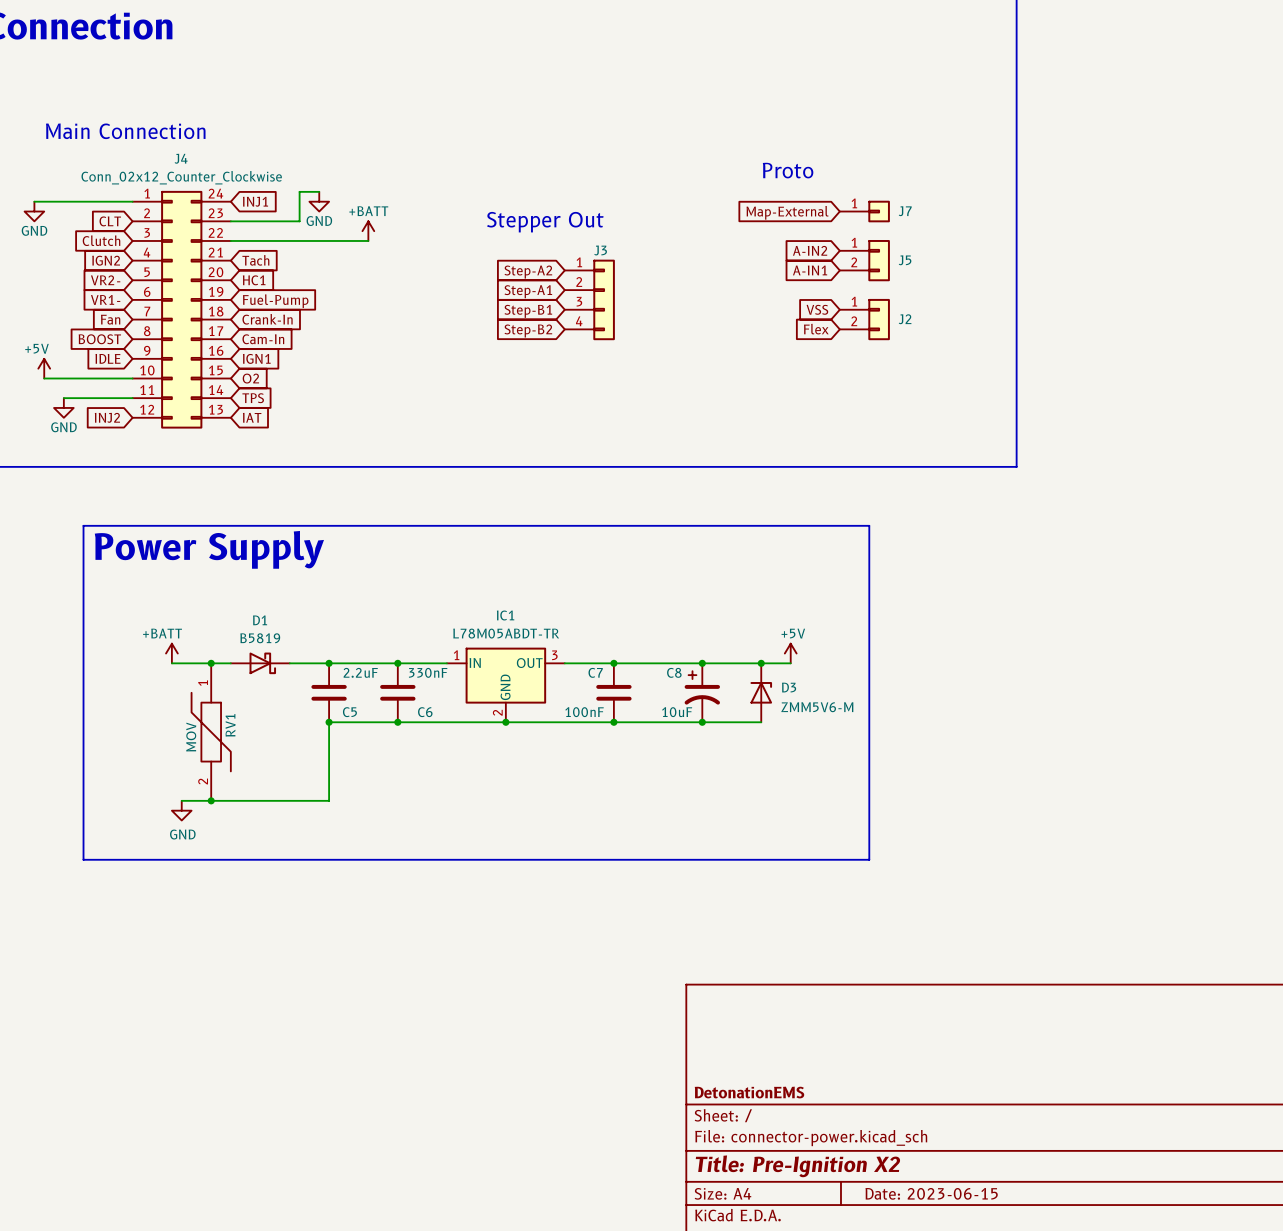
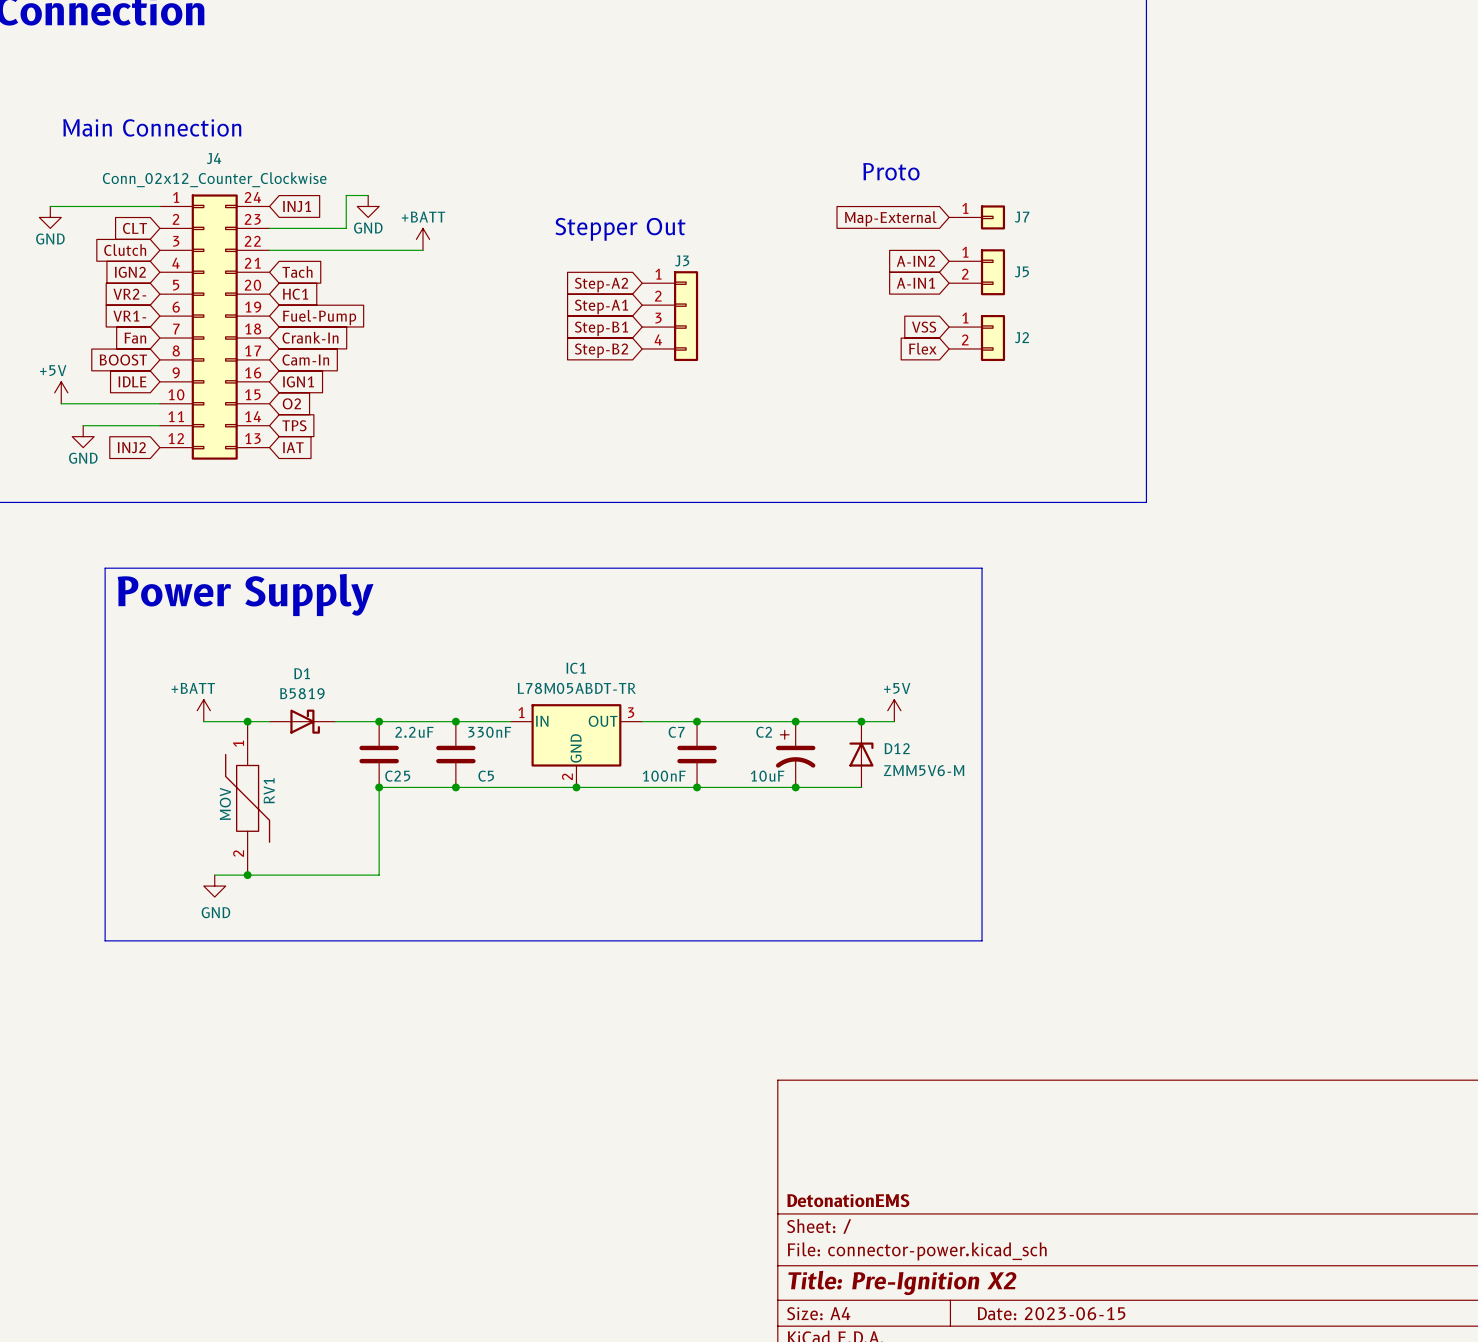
C8 name: C8 (674, 672) -> C2 (764, 732)
D3 name: D3 (789, 687) -> D12 (897, 748)
C5 name: C5 (349, 712) -> C25 (397, 776)
C6 name: C6 (425, 712) -> C5 (486, 776)

